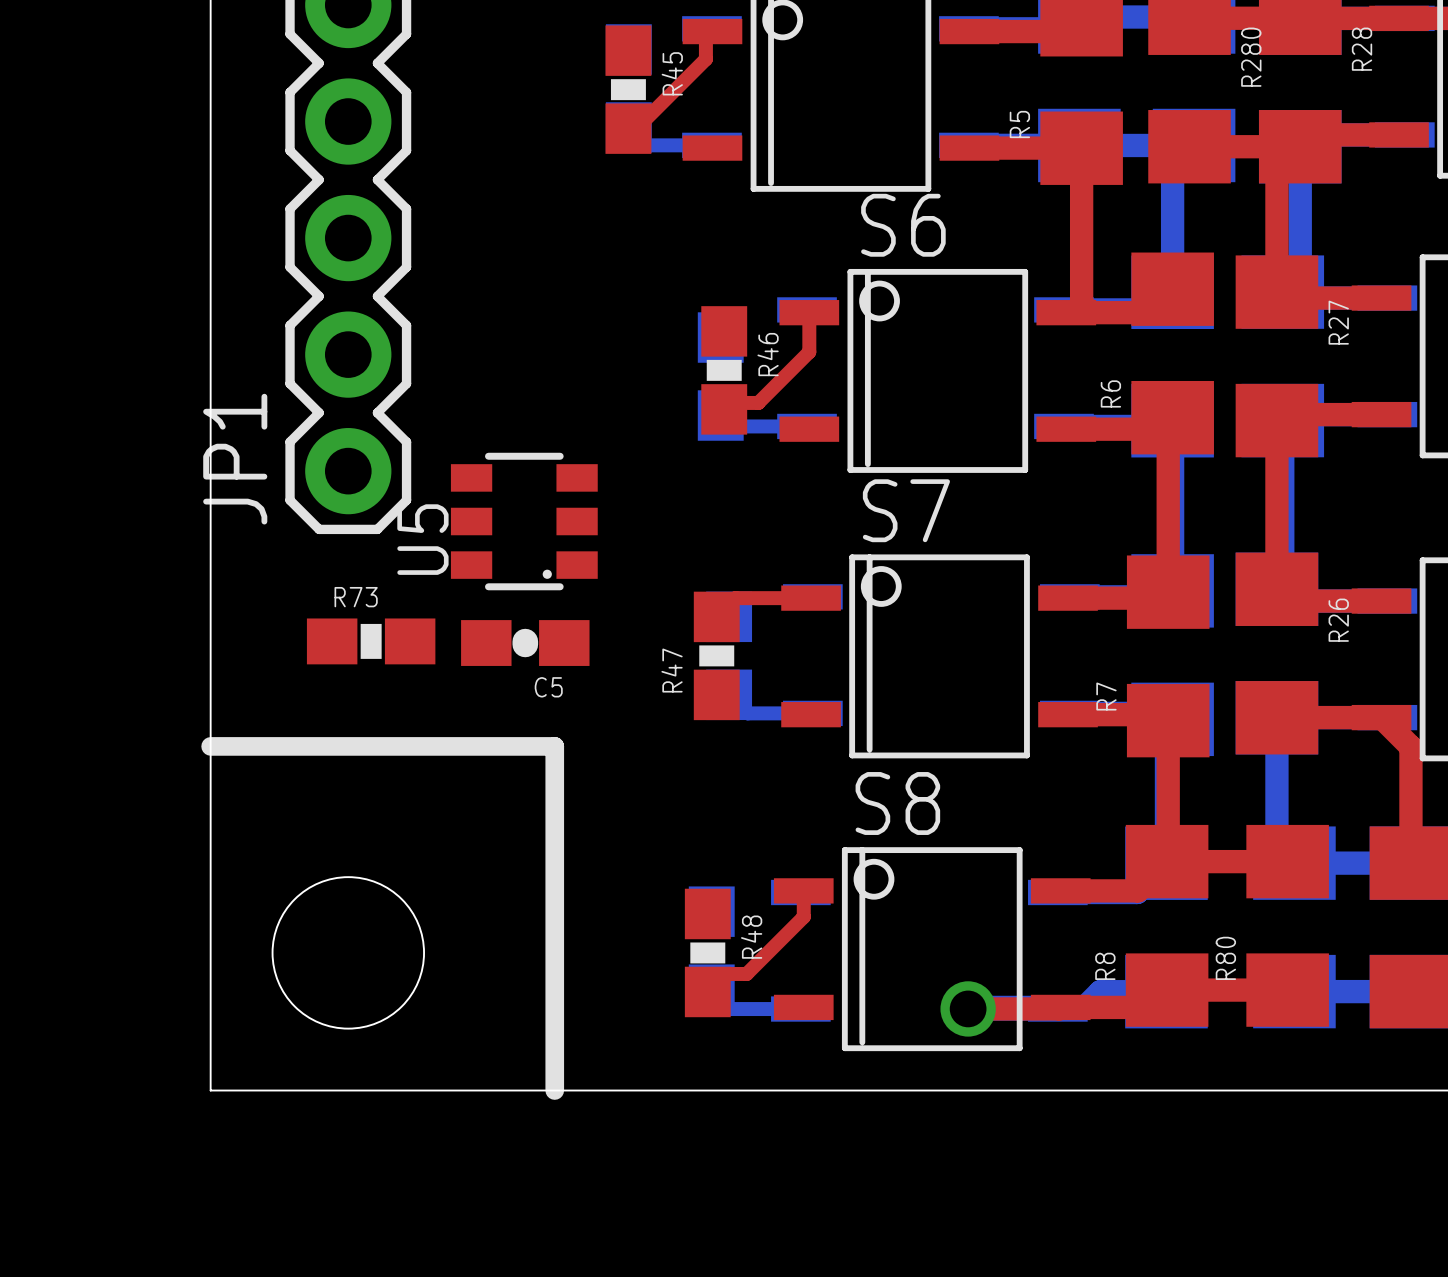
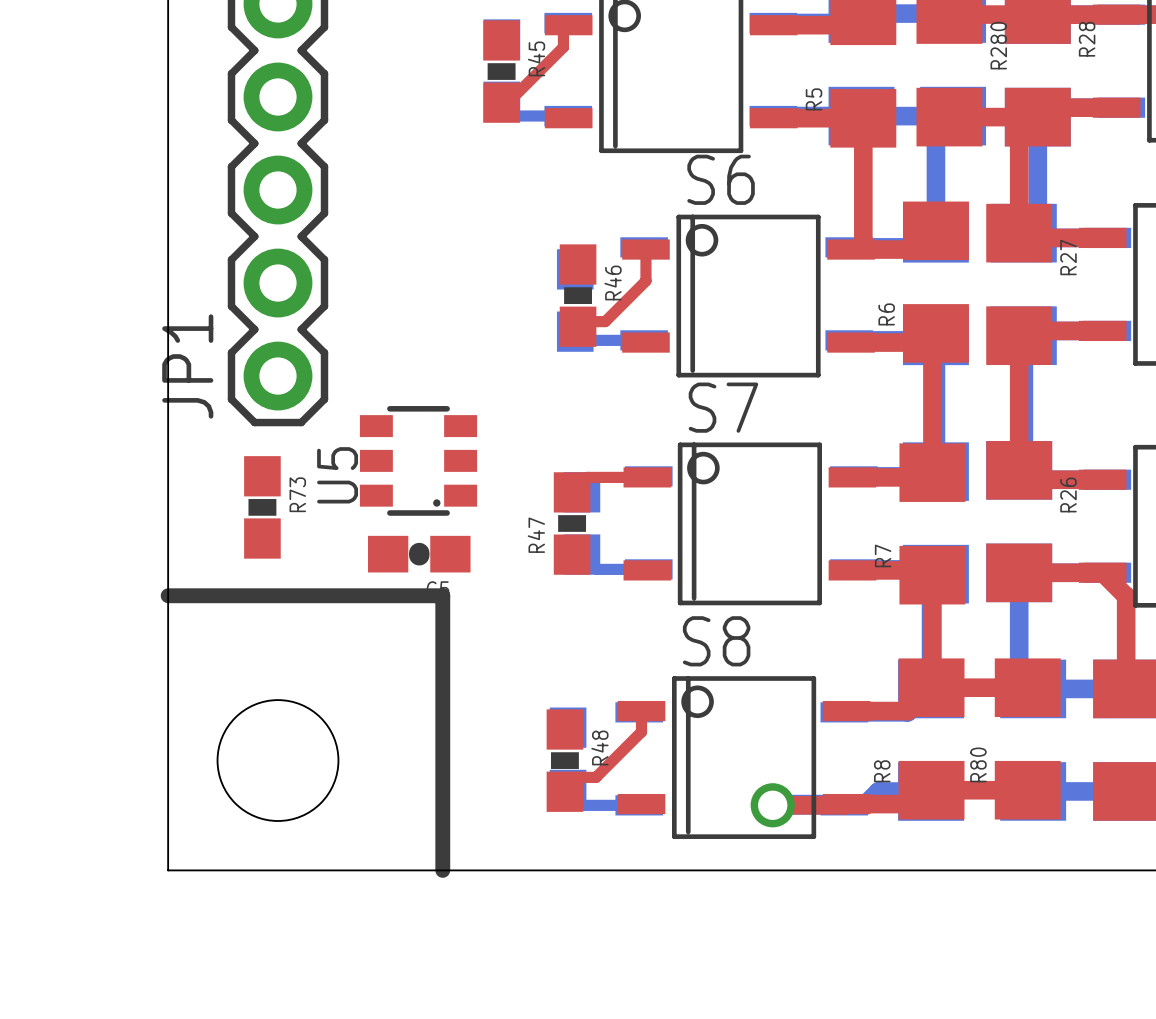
U5 position: (524, 521) -> (418, 460)
R73 rotation: 0° (371, 641) -> 90° clockwise (262, 507)
C5 position: (525, 643) -> (419, 554)

